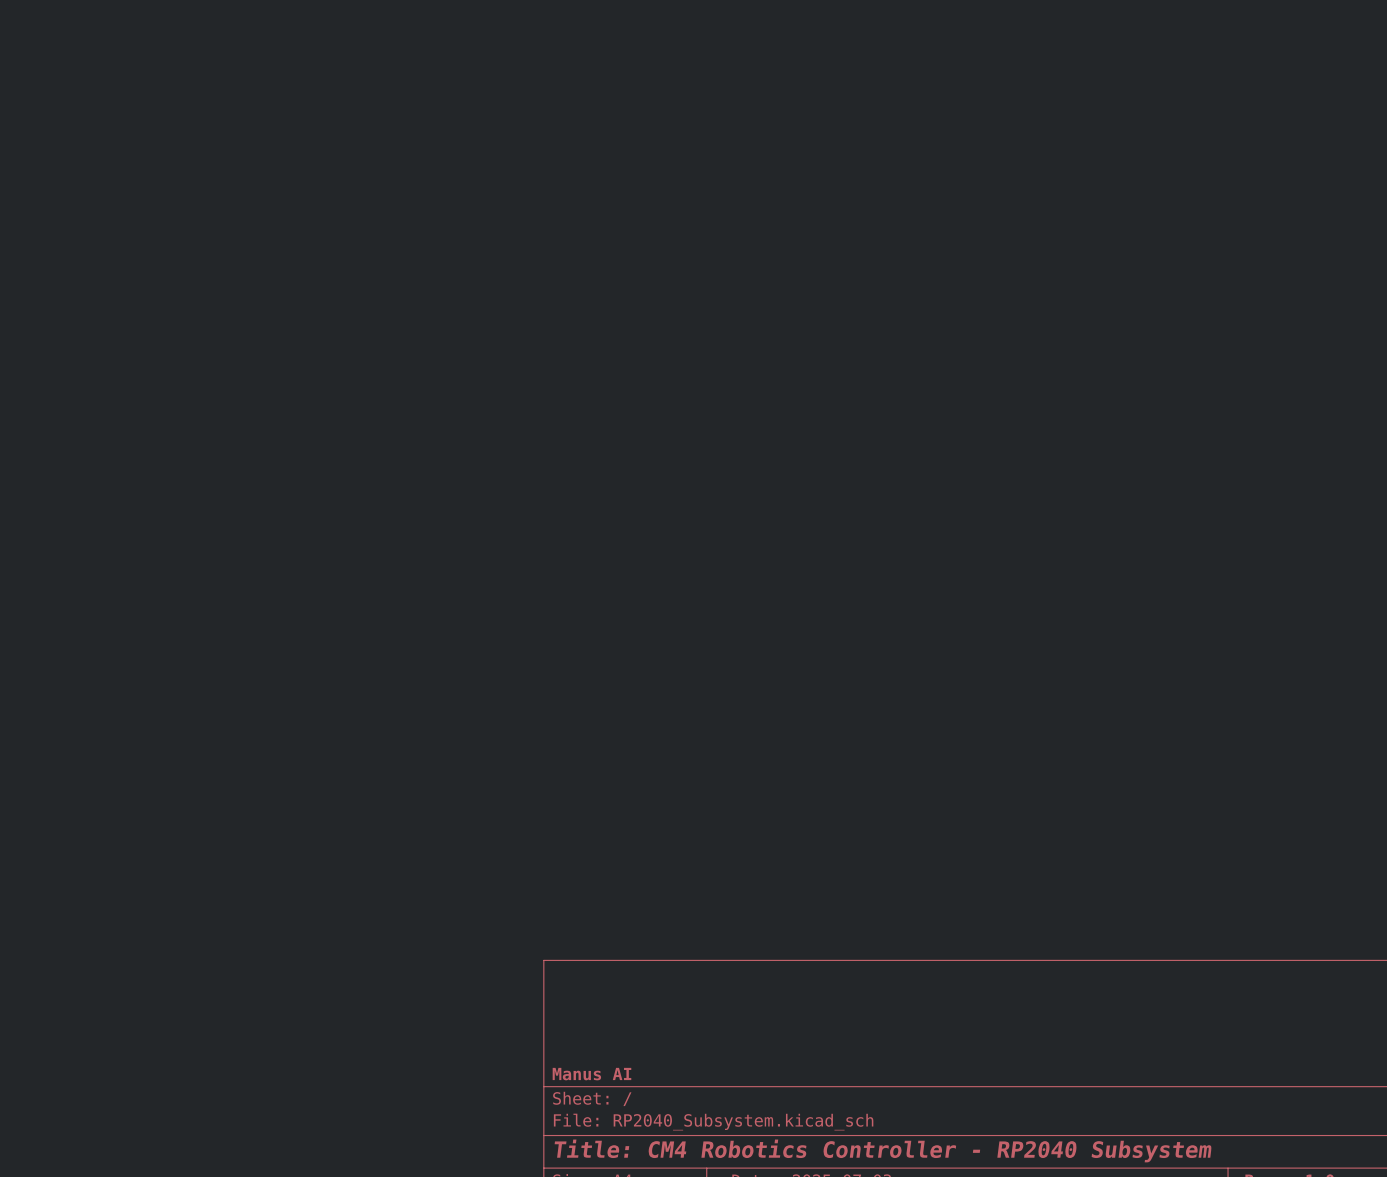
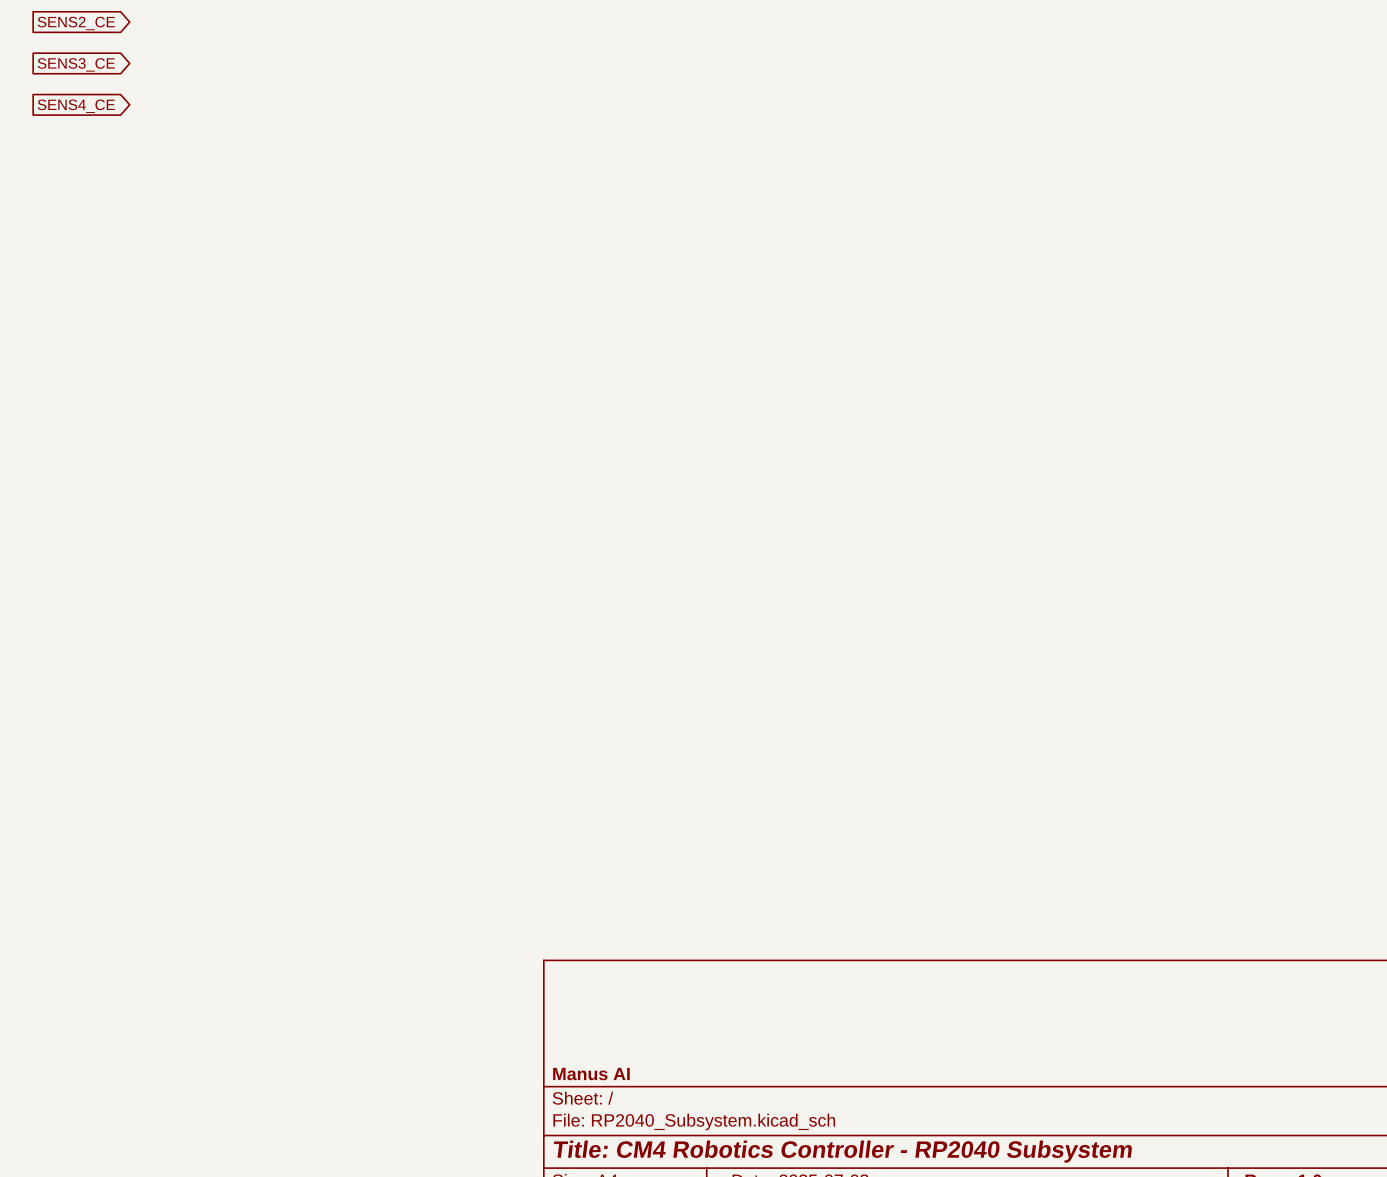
global label: none -> SENS2_CE (76, 23)
global label: none -> SENS3_CE (76, 64)
global label: none -> SENS4_CE (76, 106)

